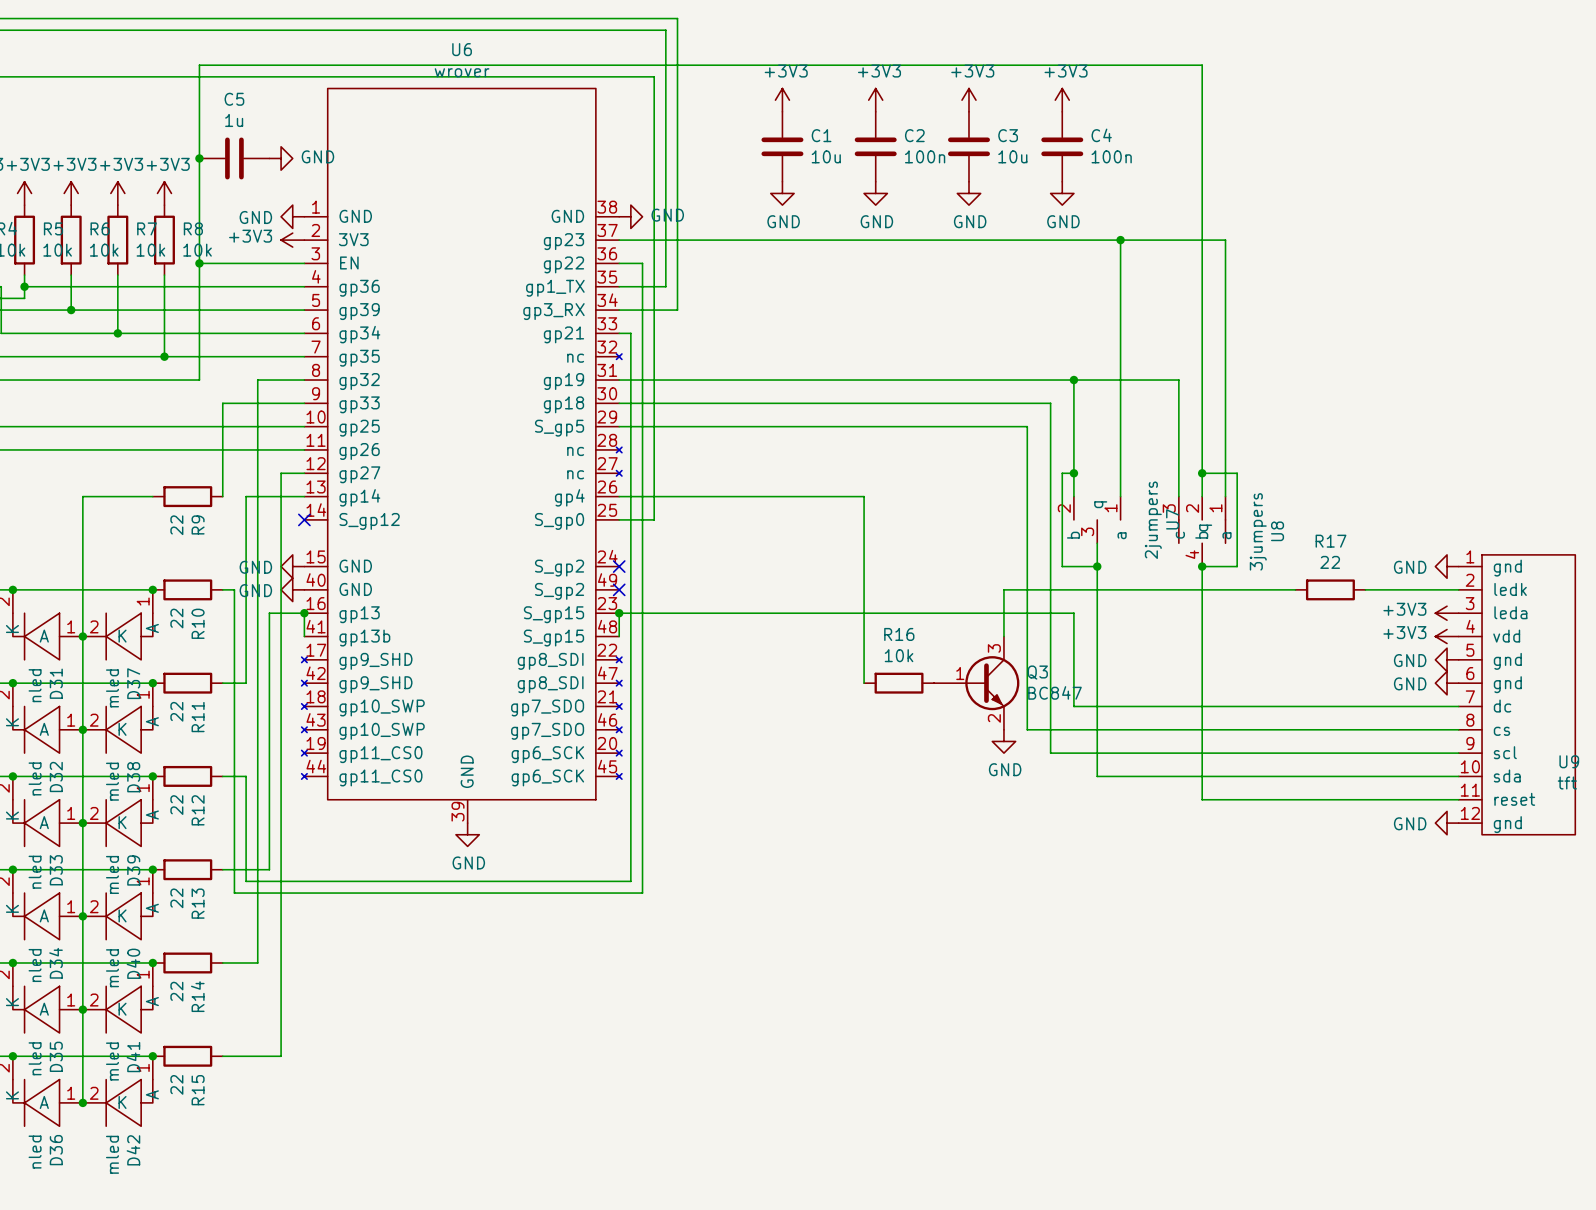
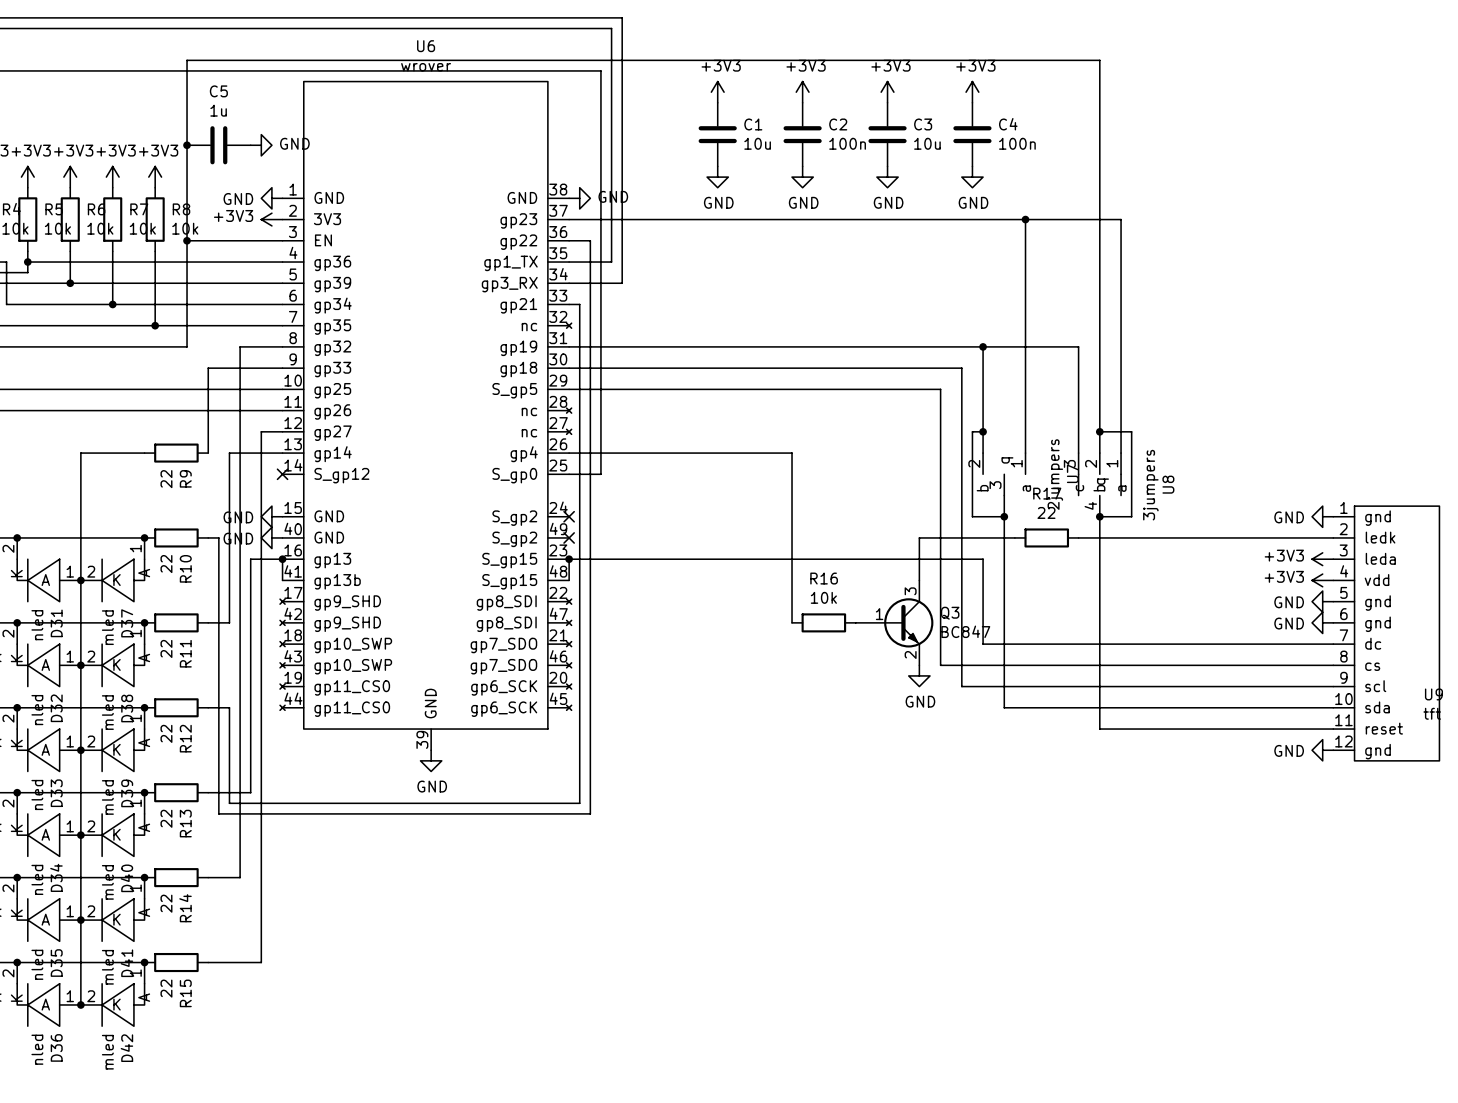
wire: (1108, 589) (1178, 589) -> (1184, 537) (1248, 537)
R17 position: (1330, 589) -> (1046, 537)

